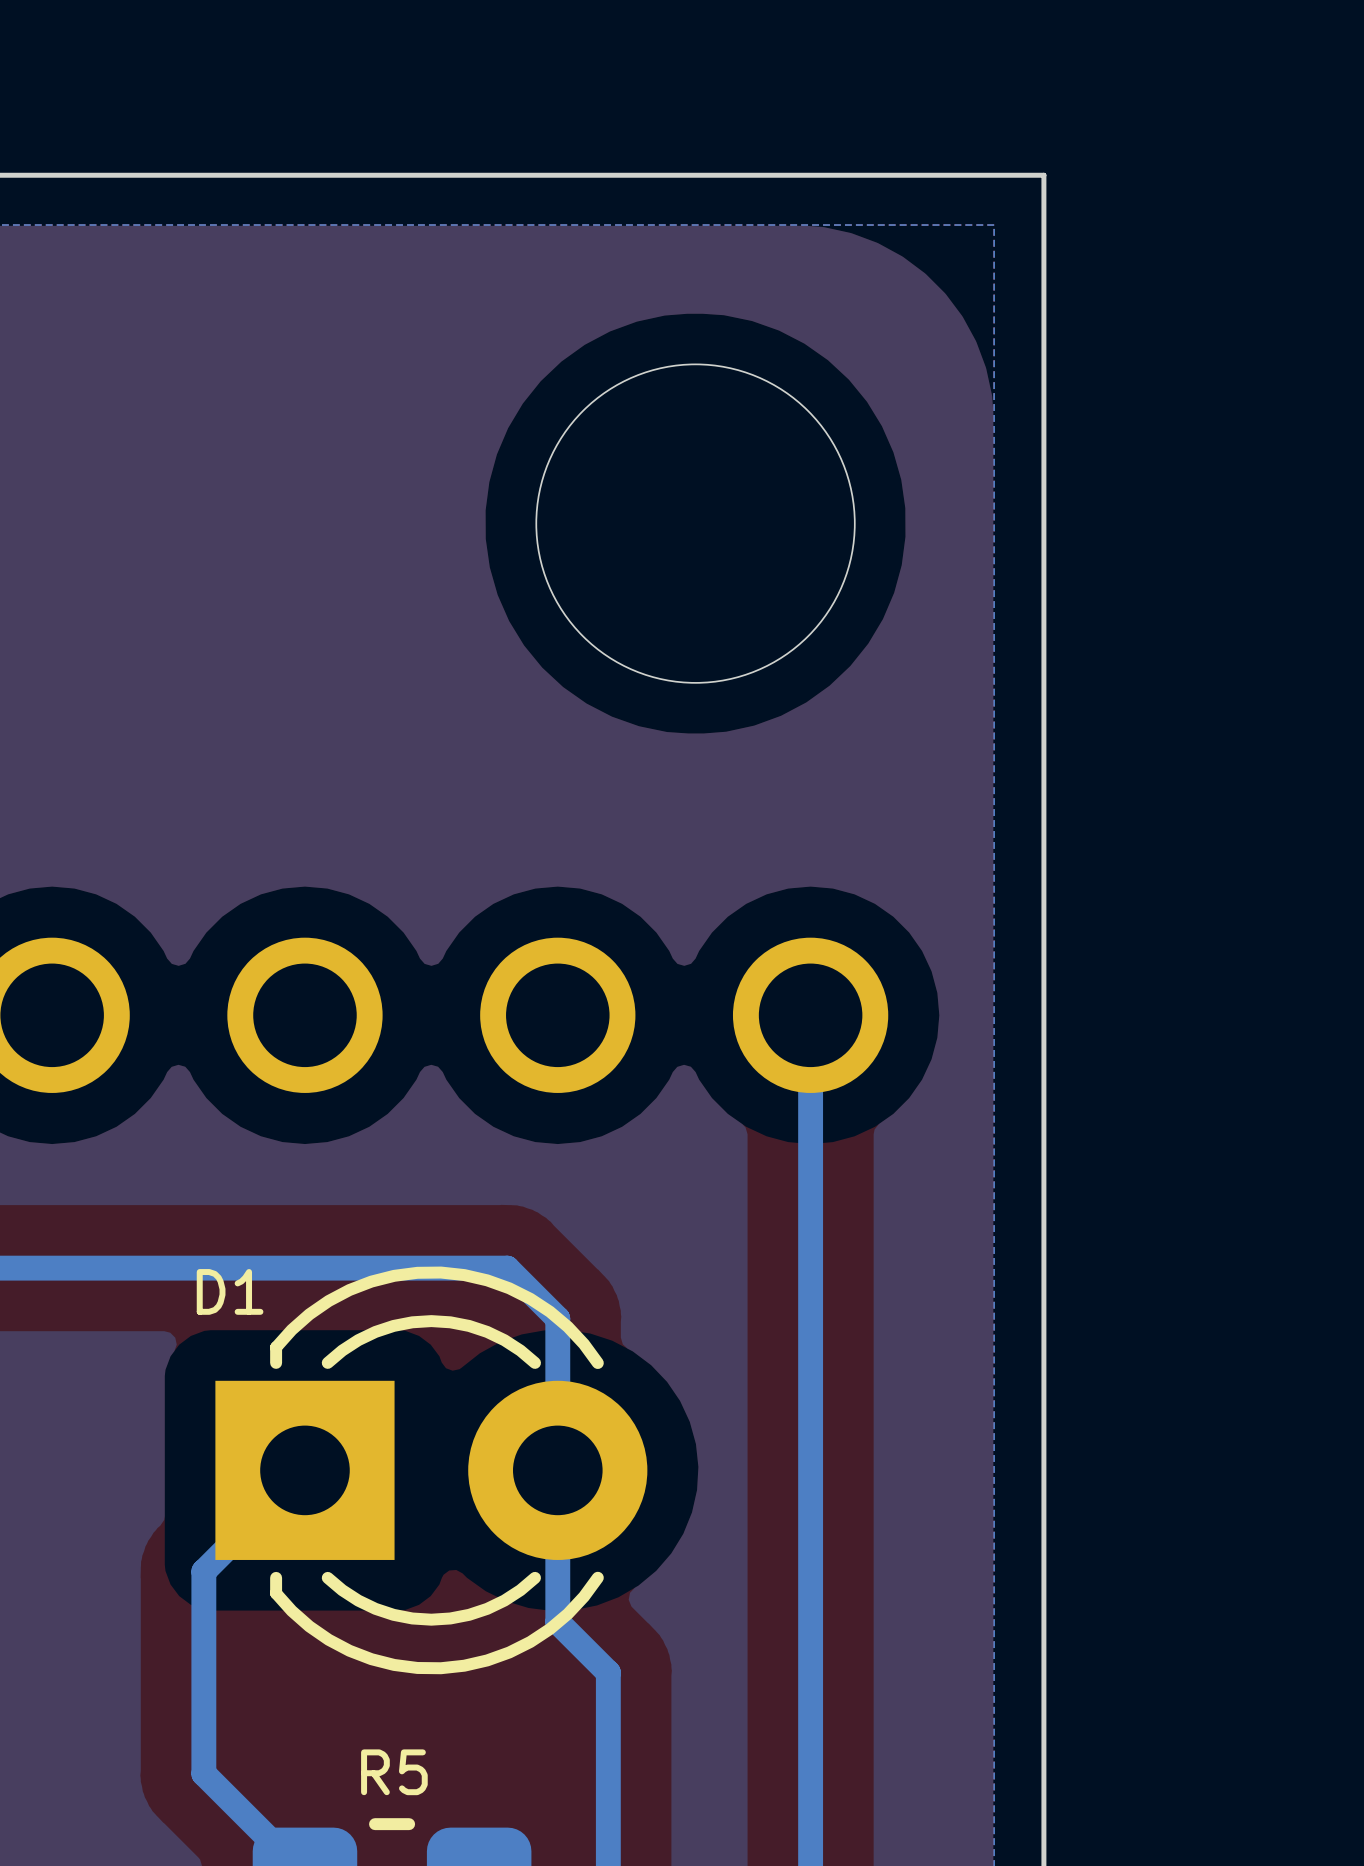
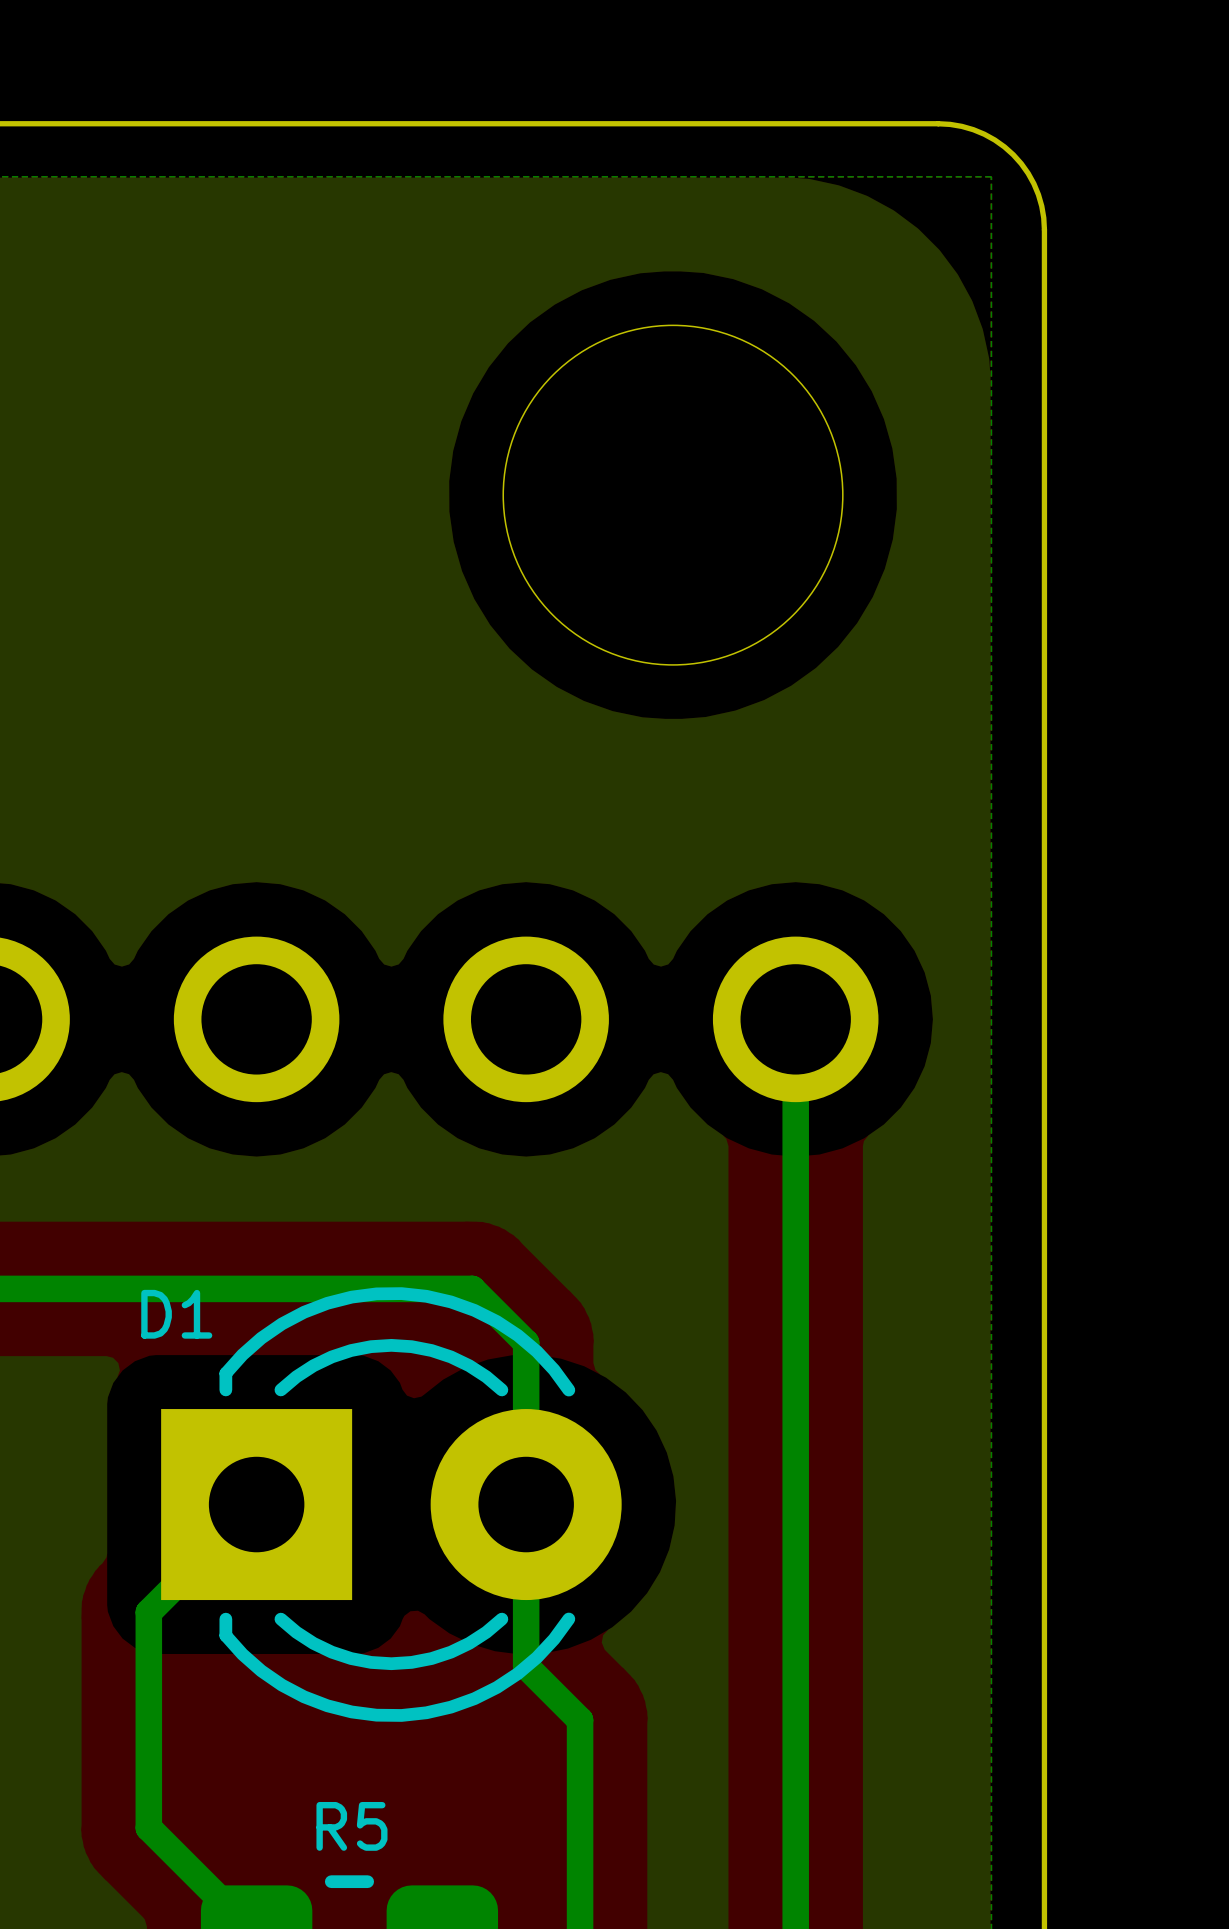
board edge: (944, 175) (1043, 175) (1043, 274) -> (938, 123) (973, 129) (994, 140) (1013, 154) (1033, 183) (1041, 206) (1044, 229)

